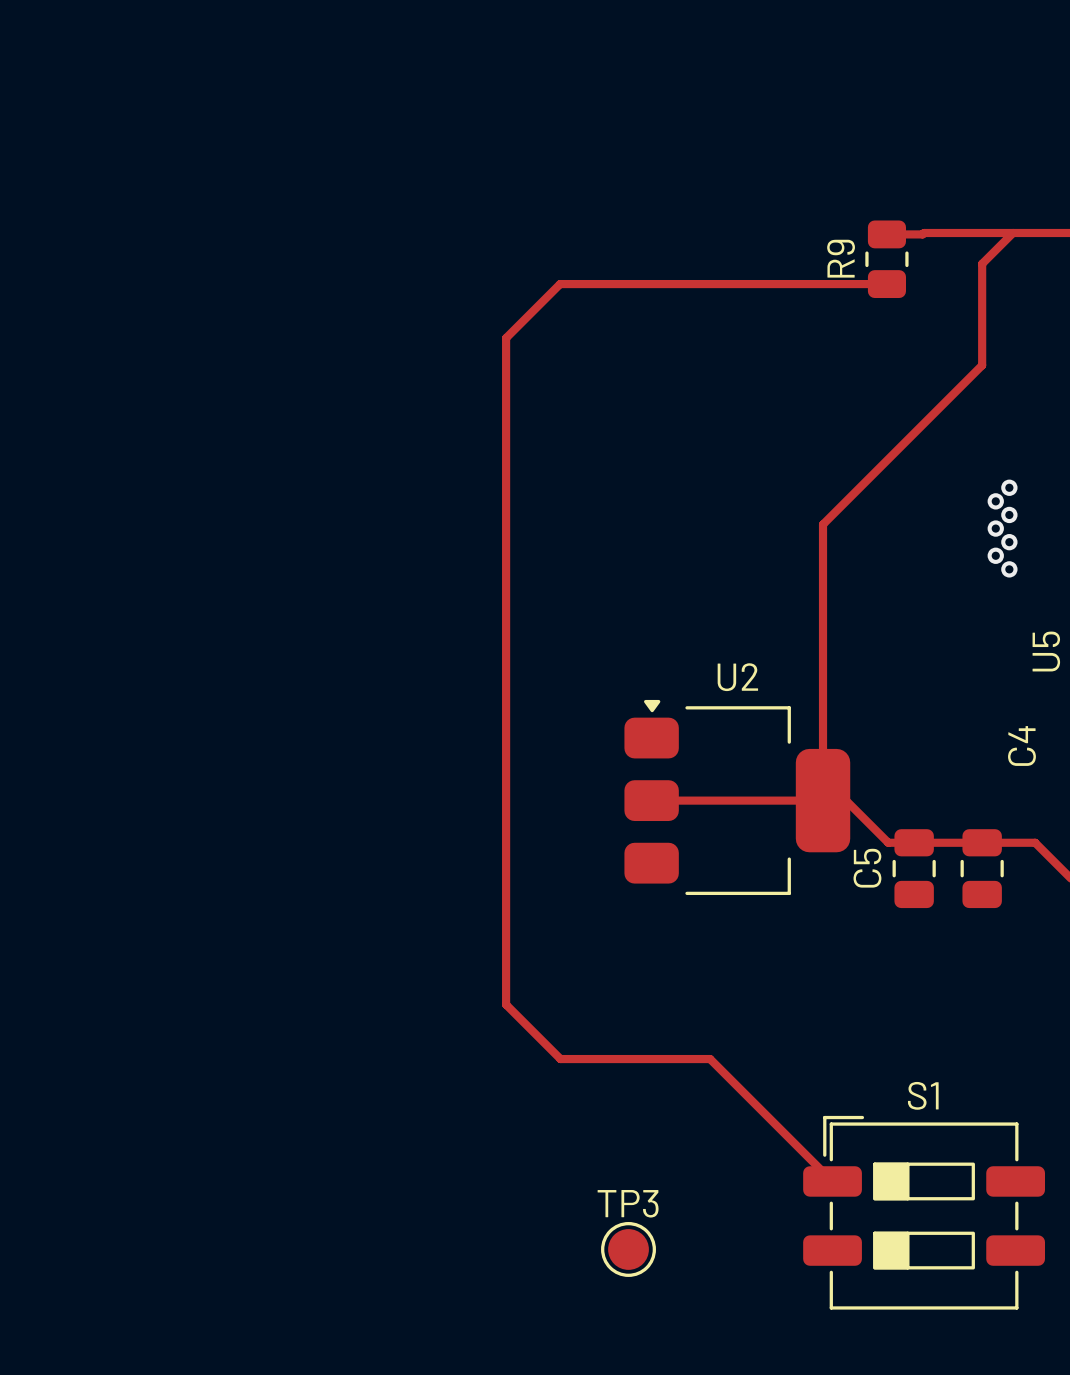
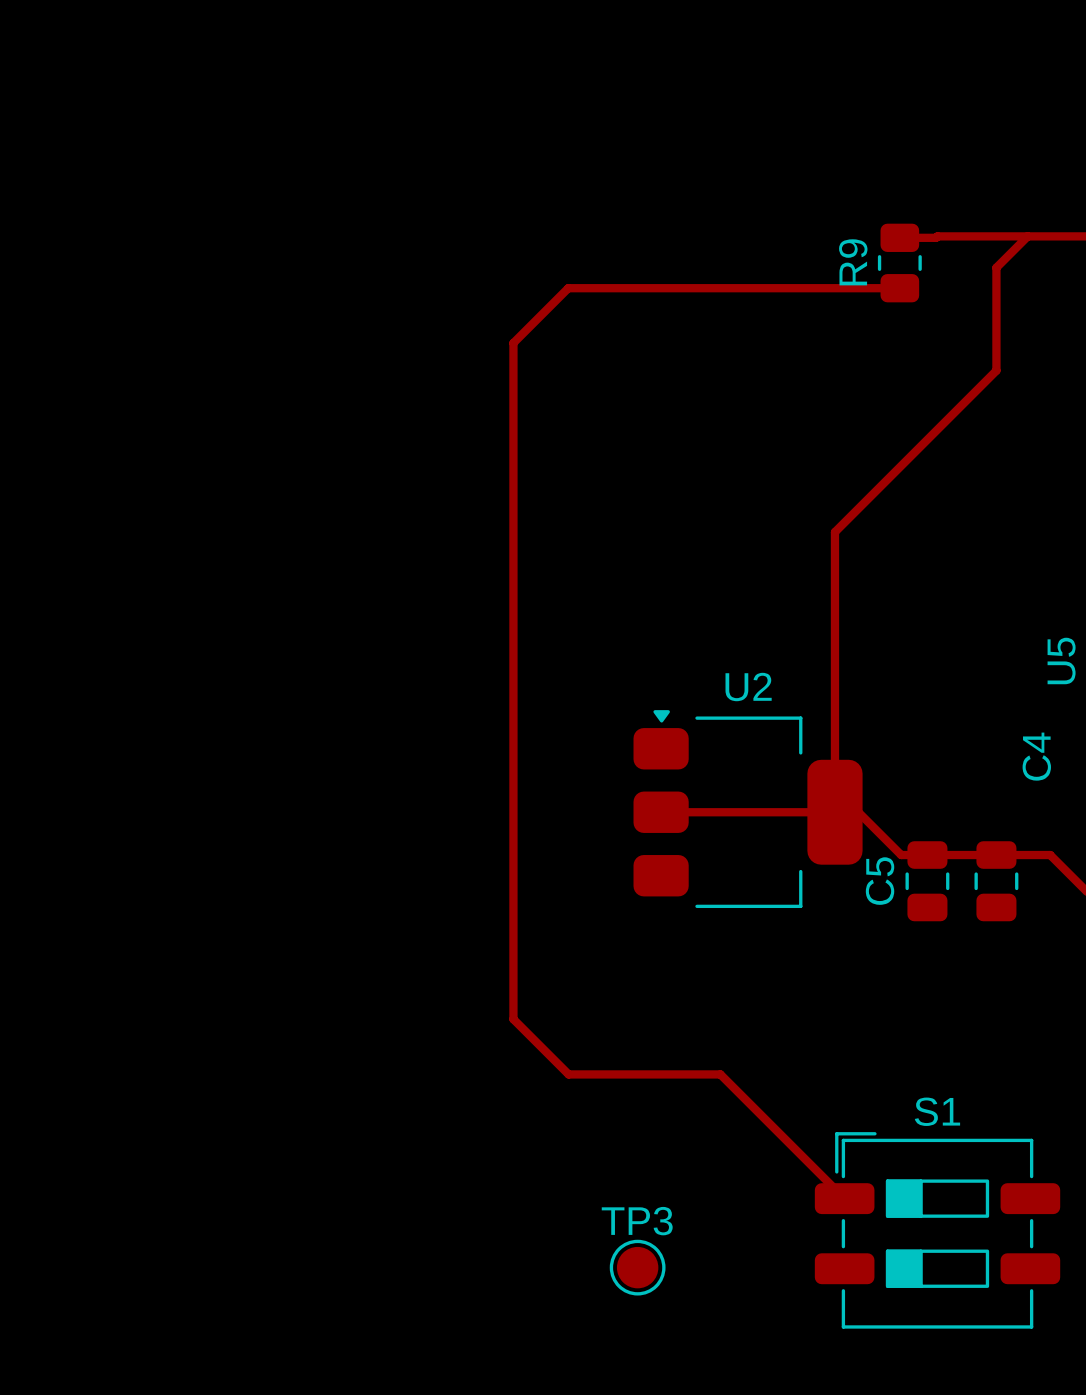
via: (1009, 487) -> none
via: (995, 501) -> none
via: (1009, 514) -> none
via: (995, 528) -> none
via: (1009, 542) -> none
via: (995, 555) -> none
via: (1009, 569) -> none

